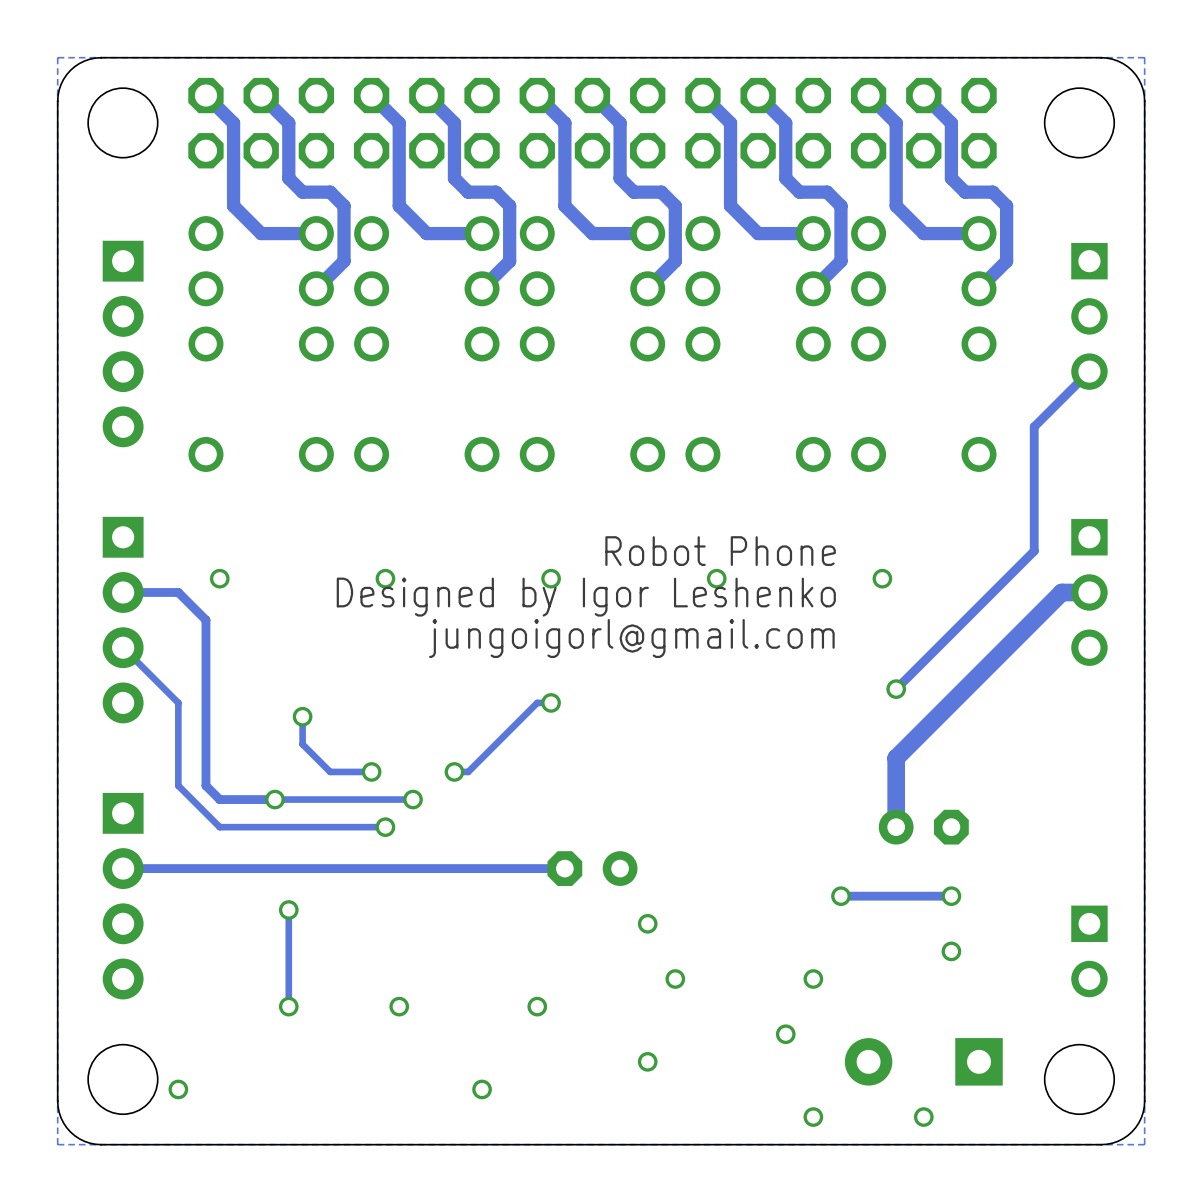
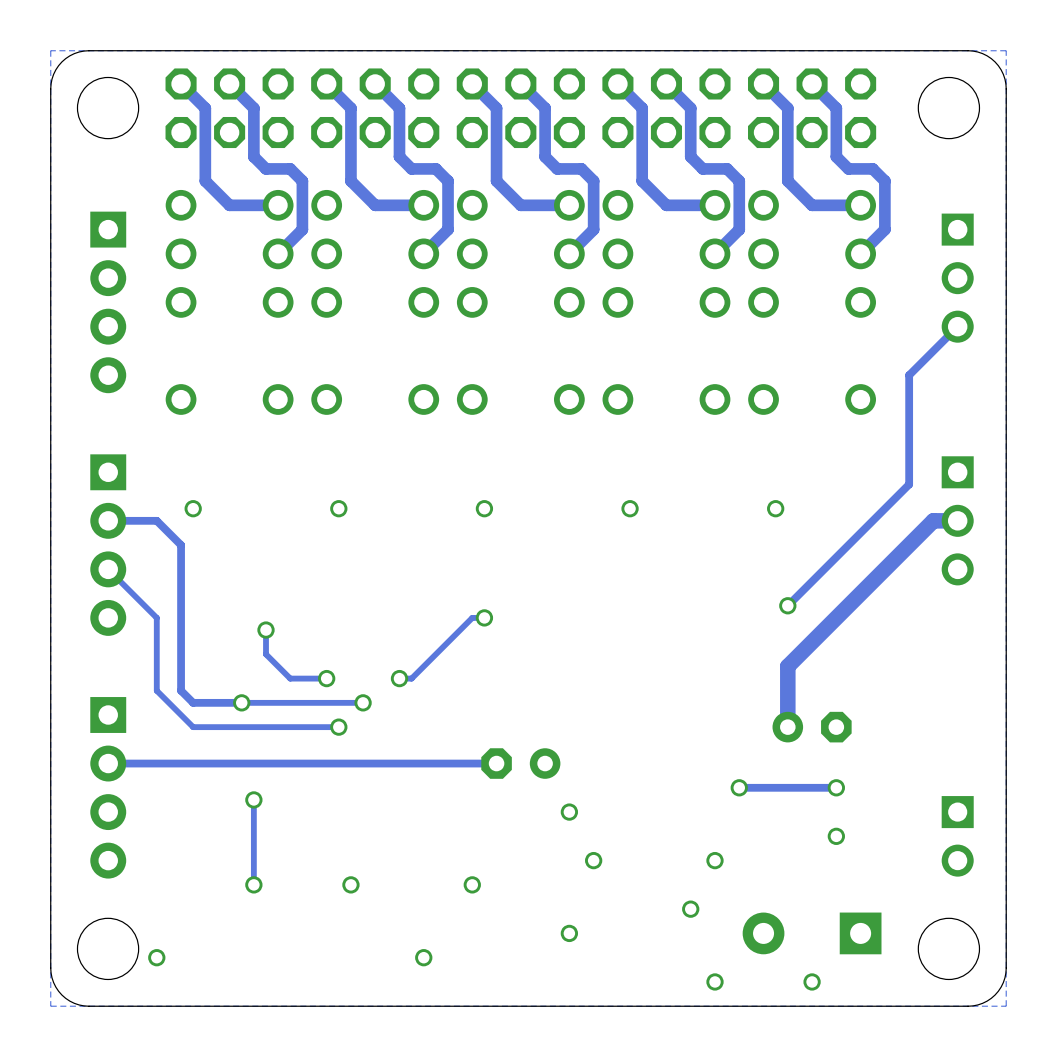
text: Robot Phone (720, 551) -> none
text: Designed by Igor Leshenko (586, 597) -> none
text: jungoigorl@gmail.com (631, 638) -> none

